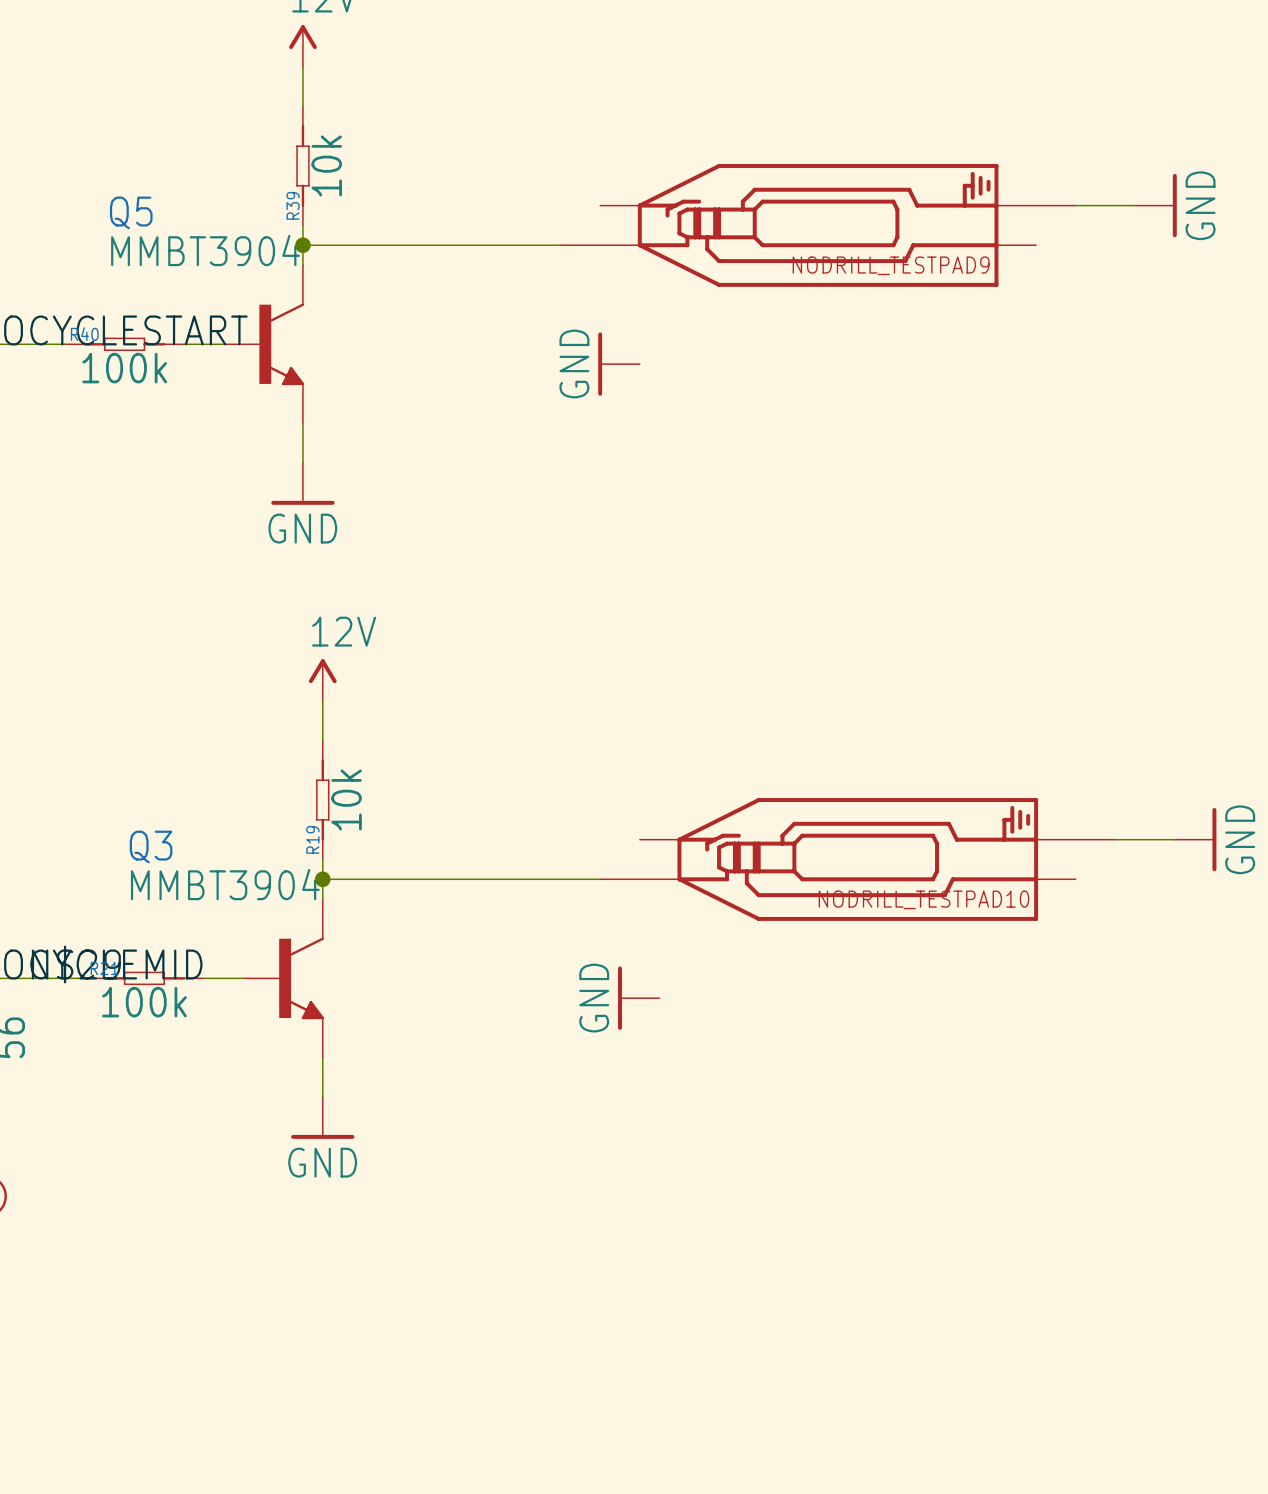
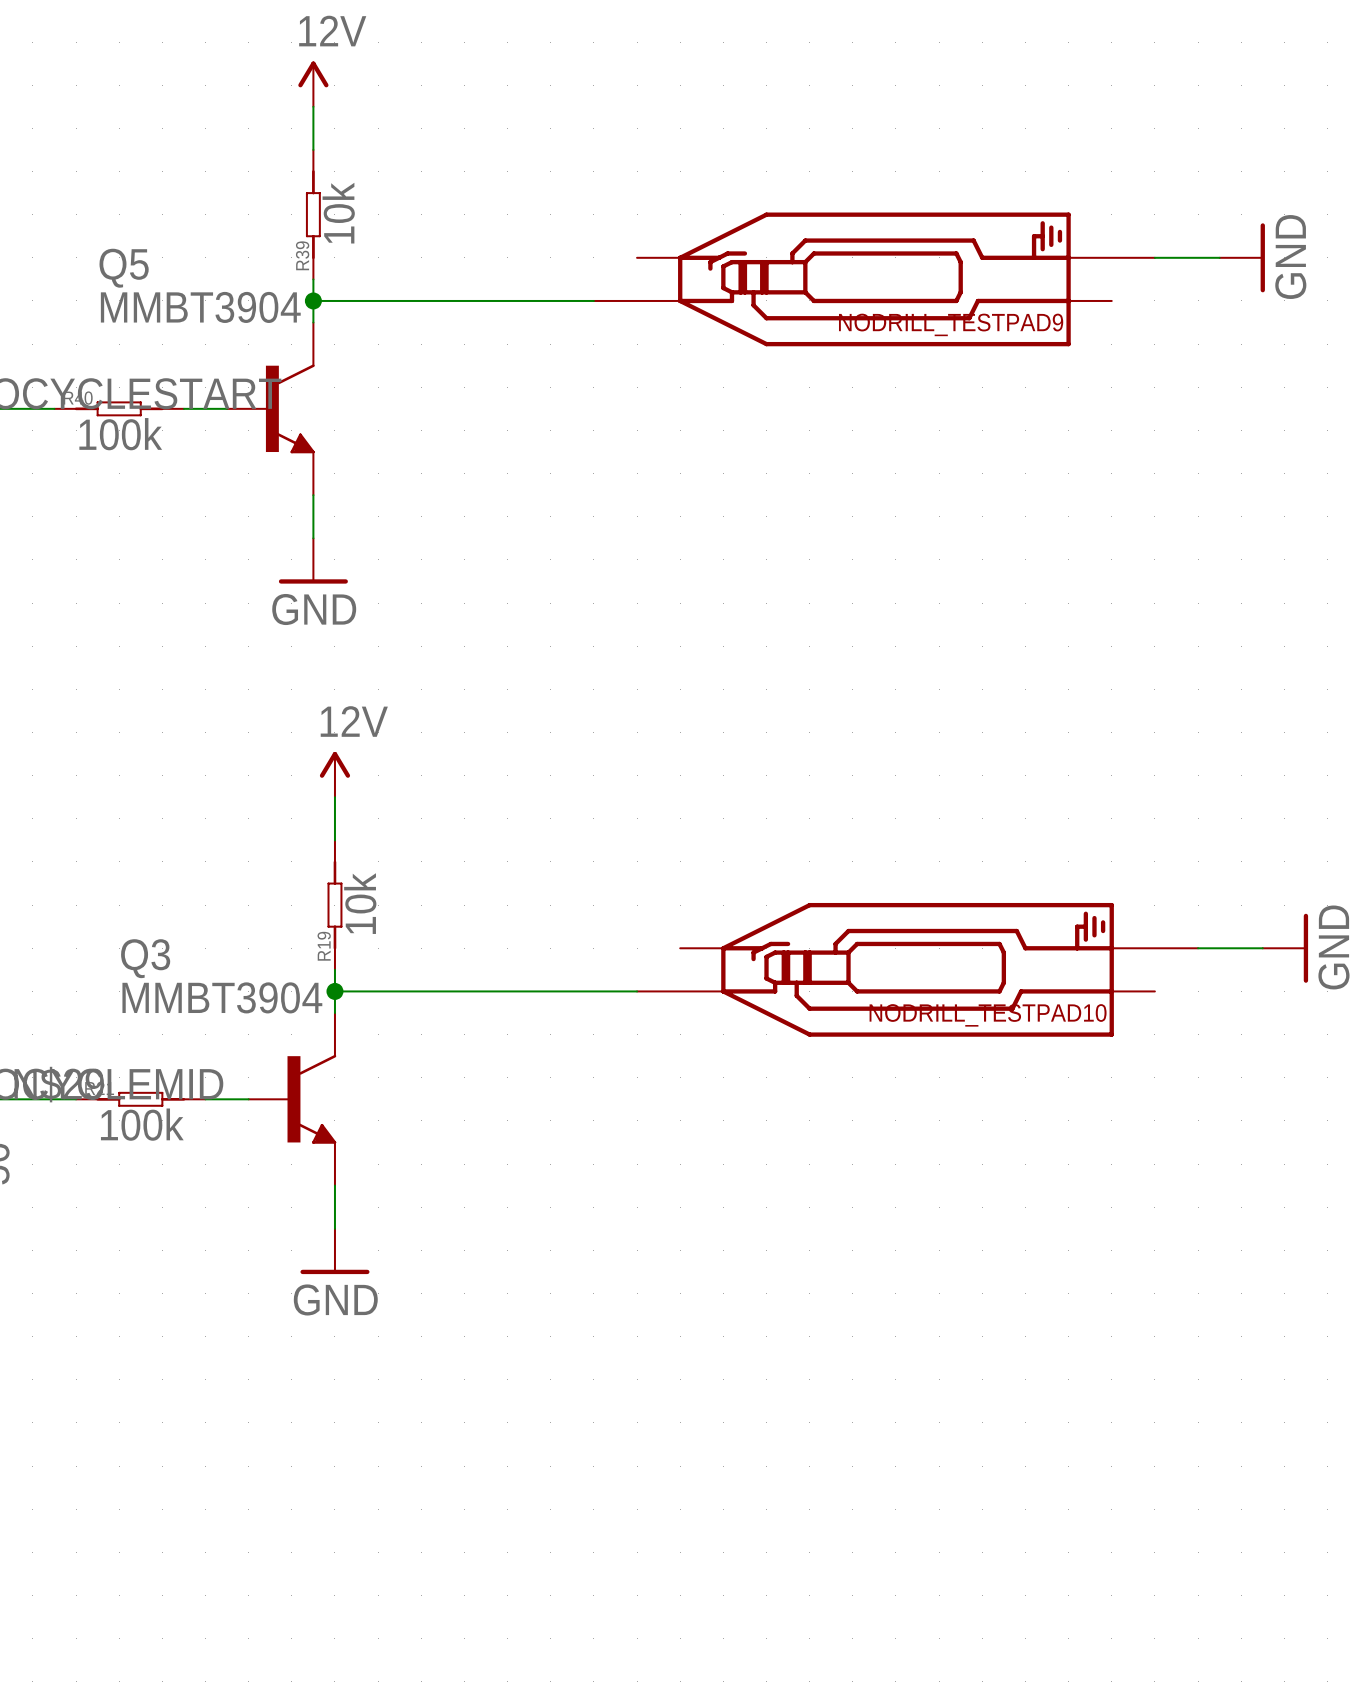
power symbol: GND (619, 364) -> none
power symbol: GND (638, 998) -> none

